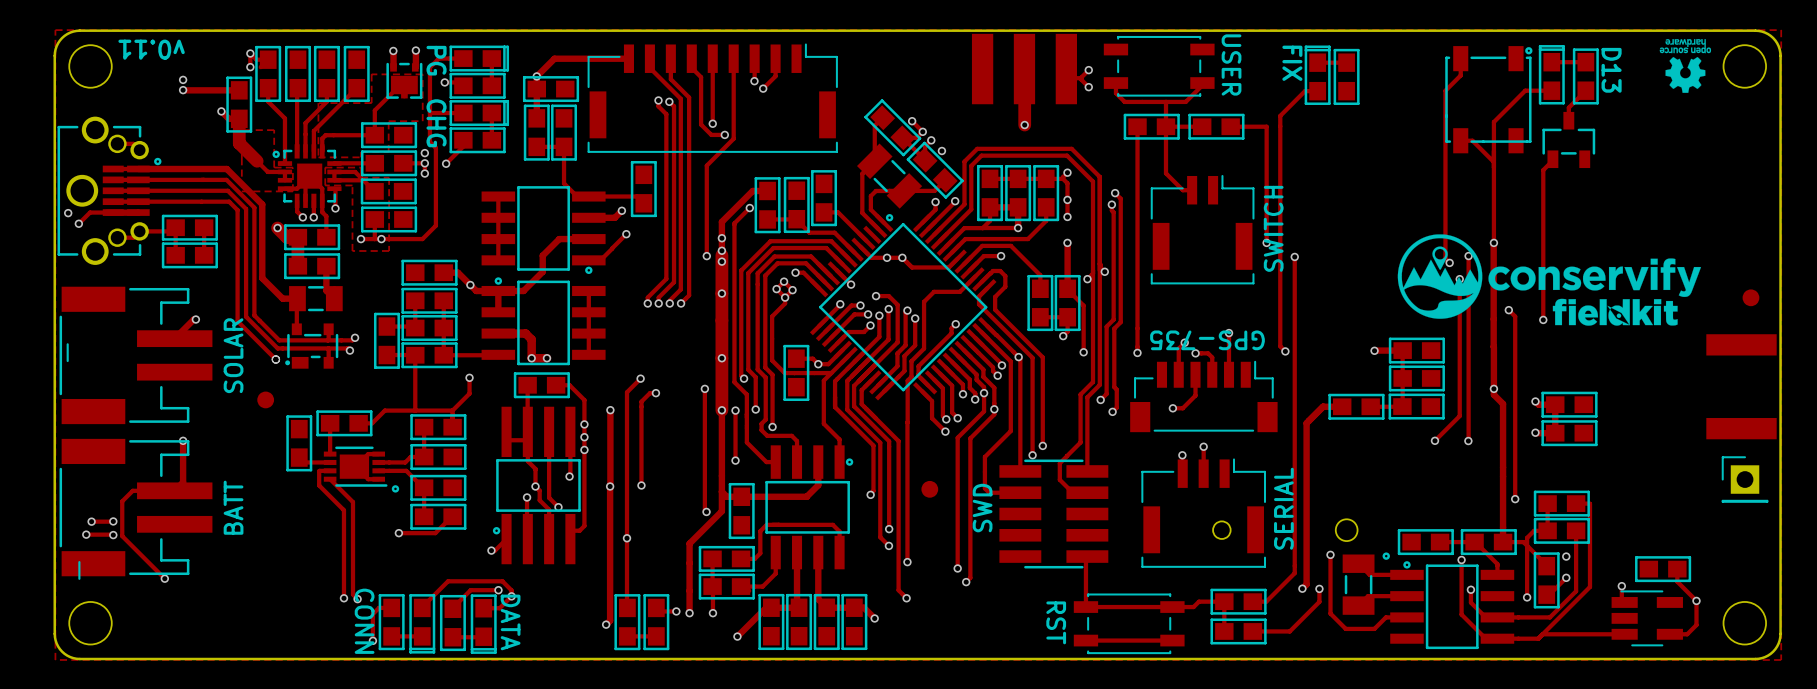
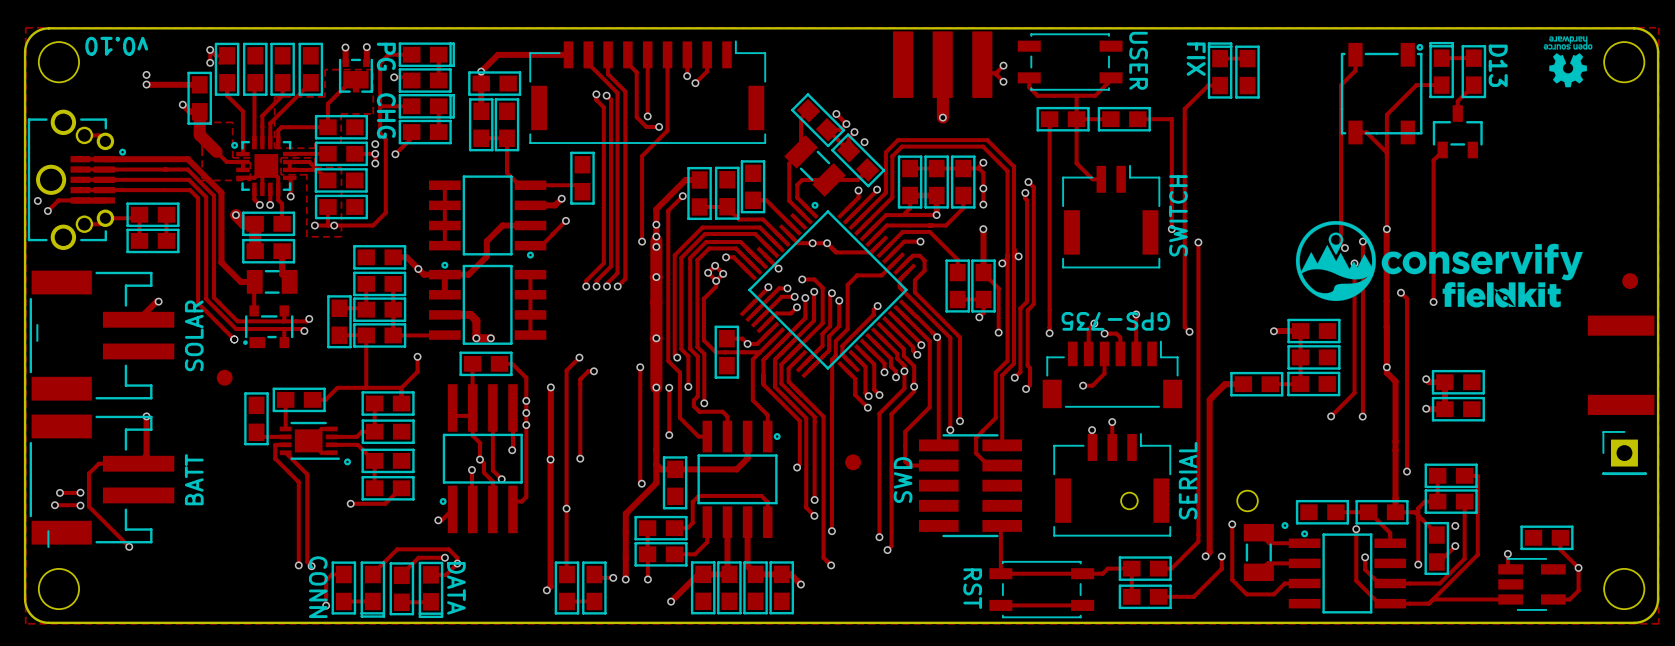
text: v0.11 (151, 49) -> v0.10 (116, 46)

